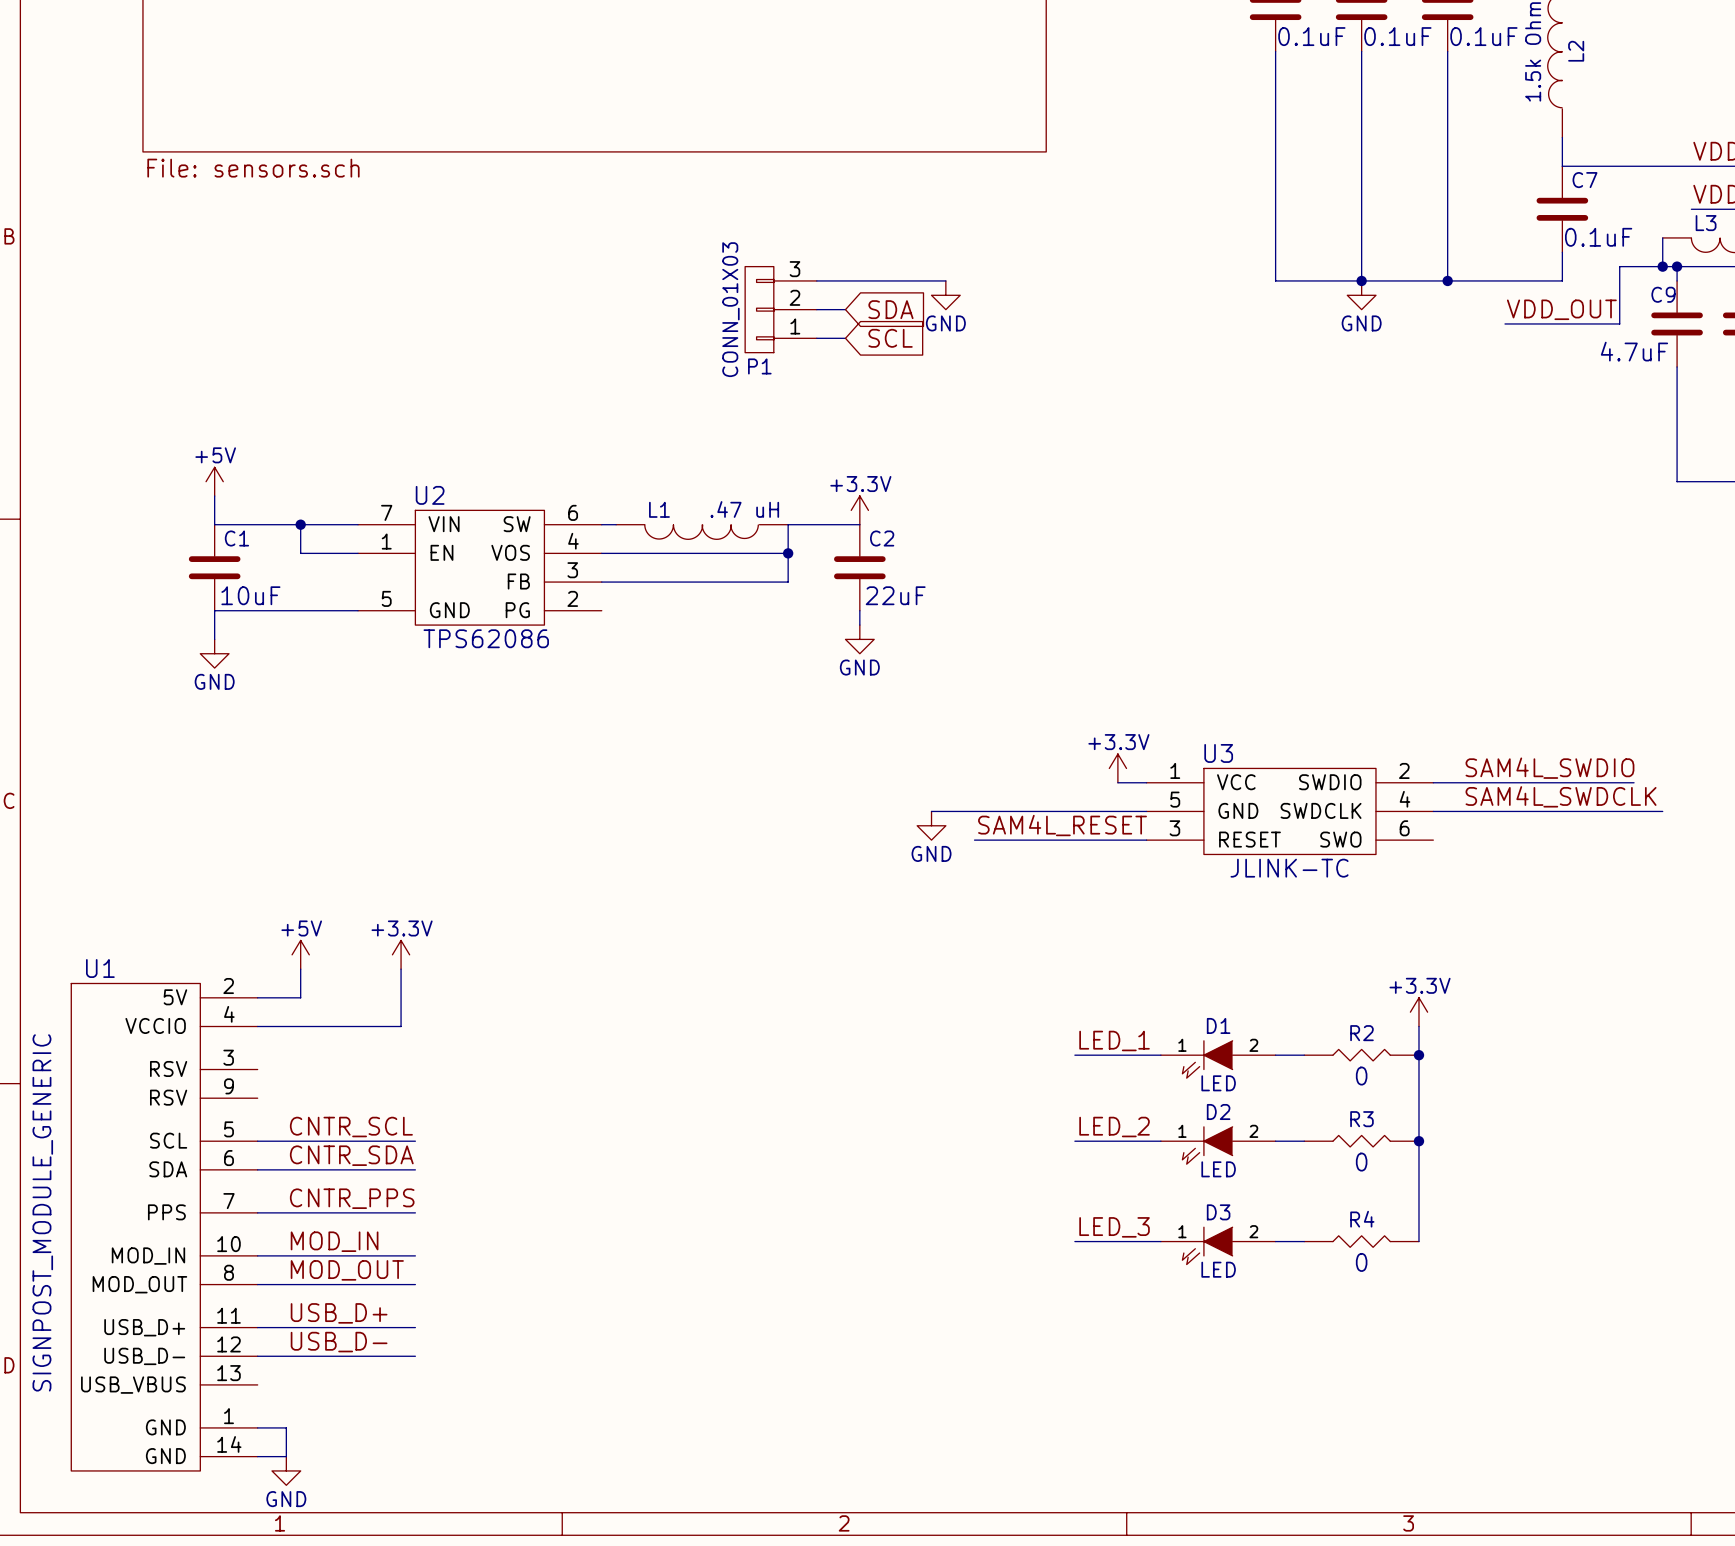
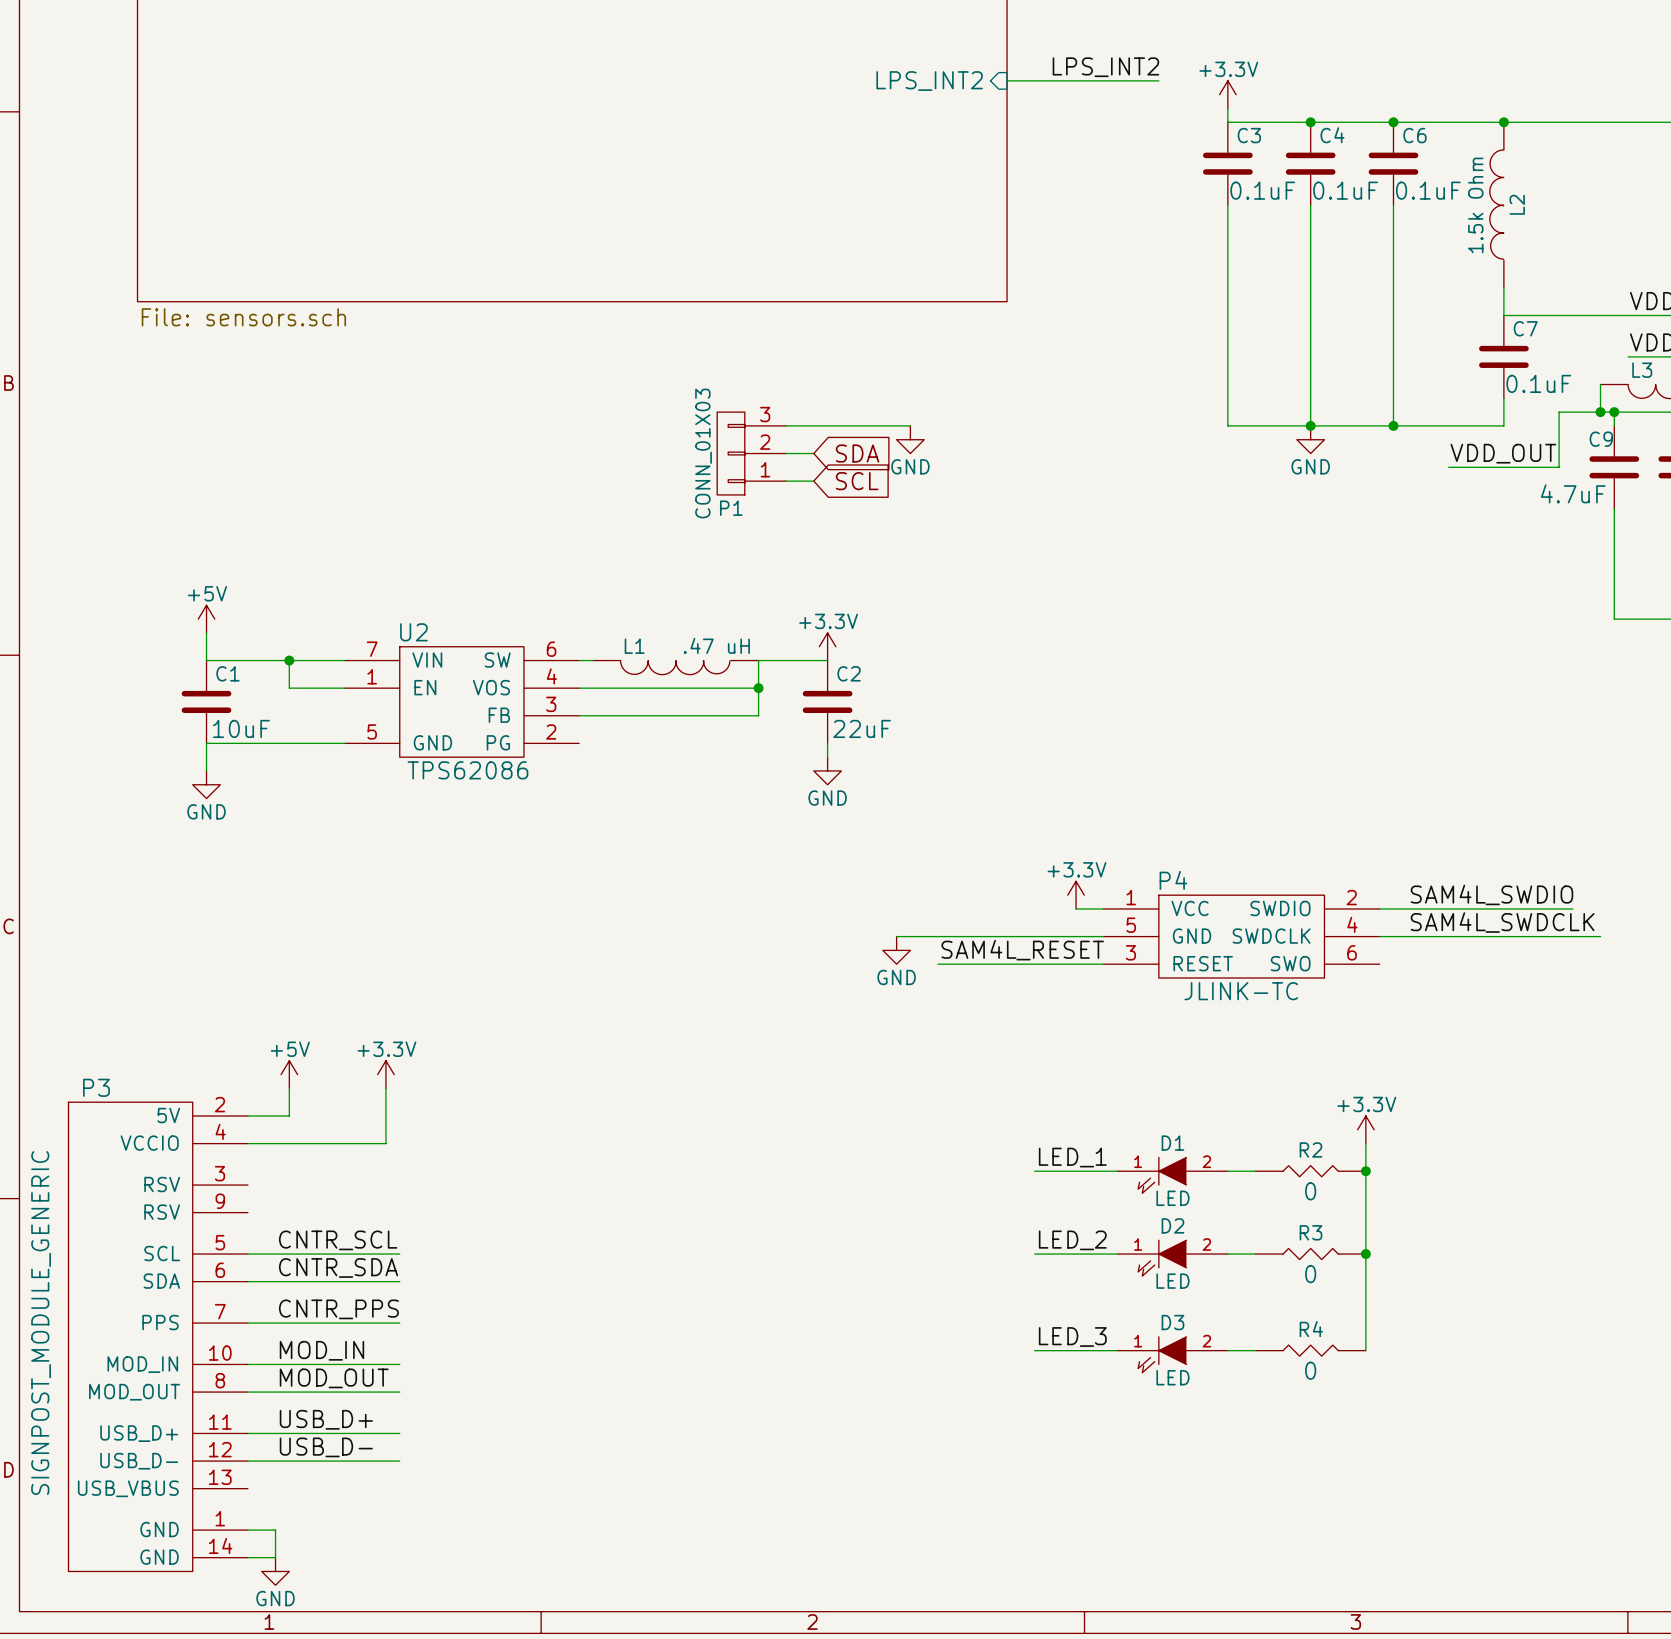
U3 name: U3 (1218, 753) -> P4 (1173, 880)
U1 name: U1 (100, 968) -> P3 (96, 1087)

